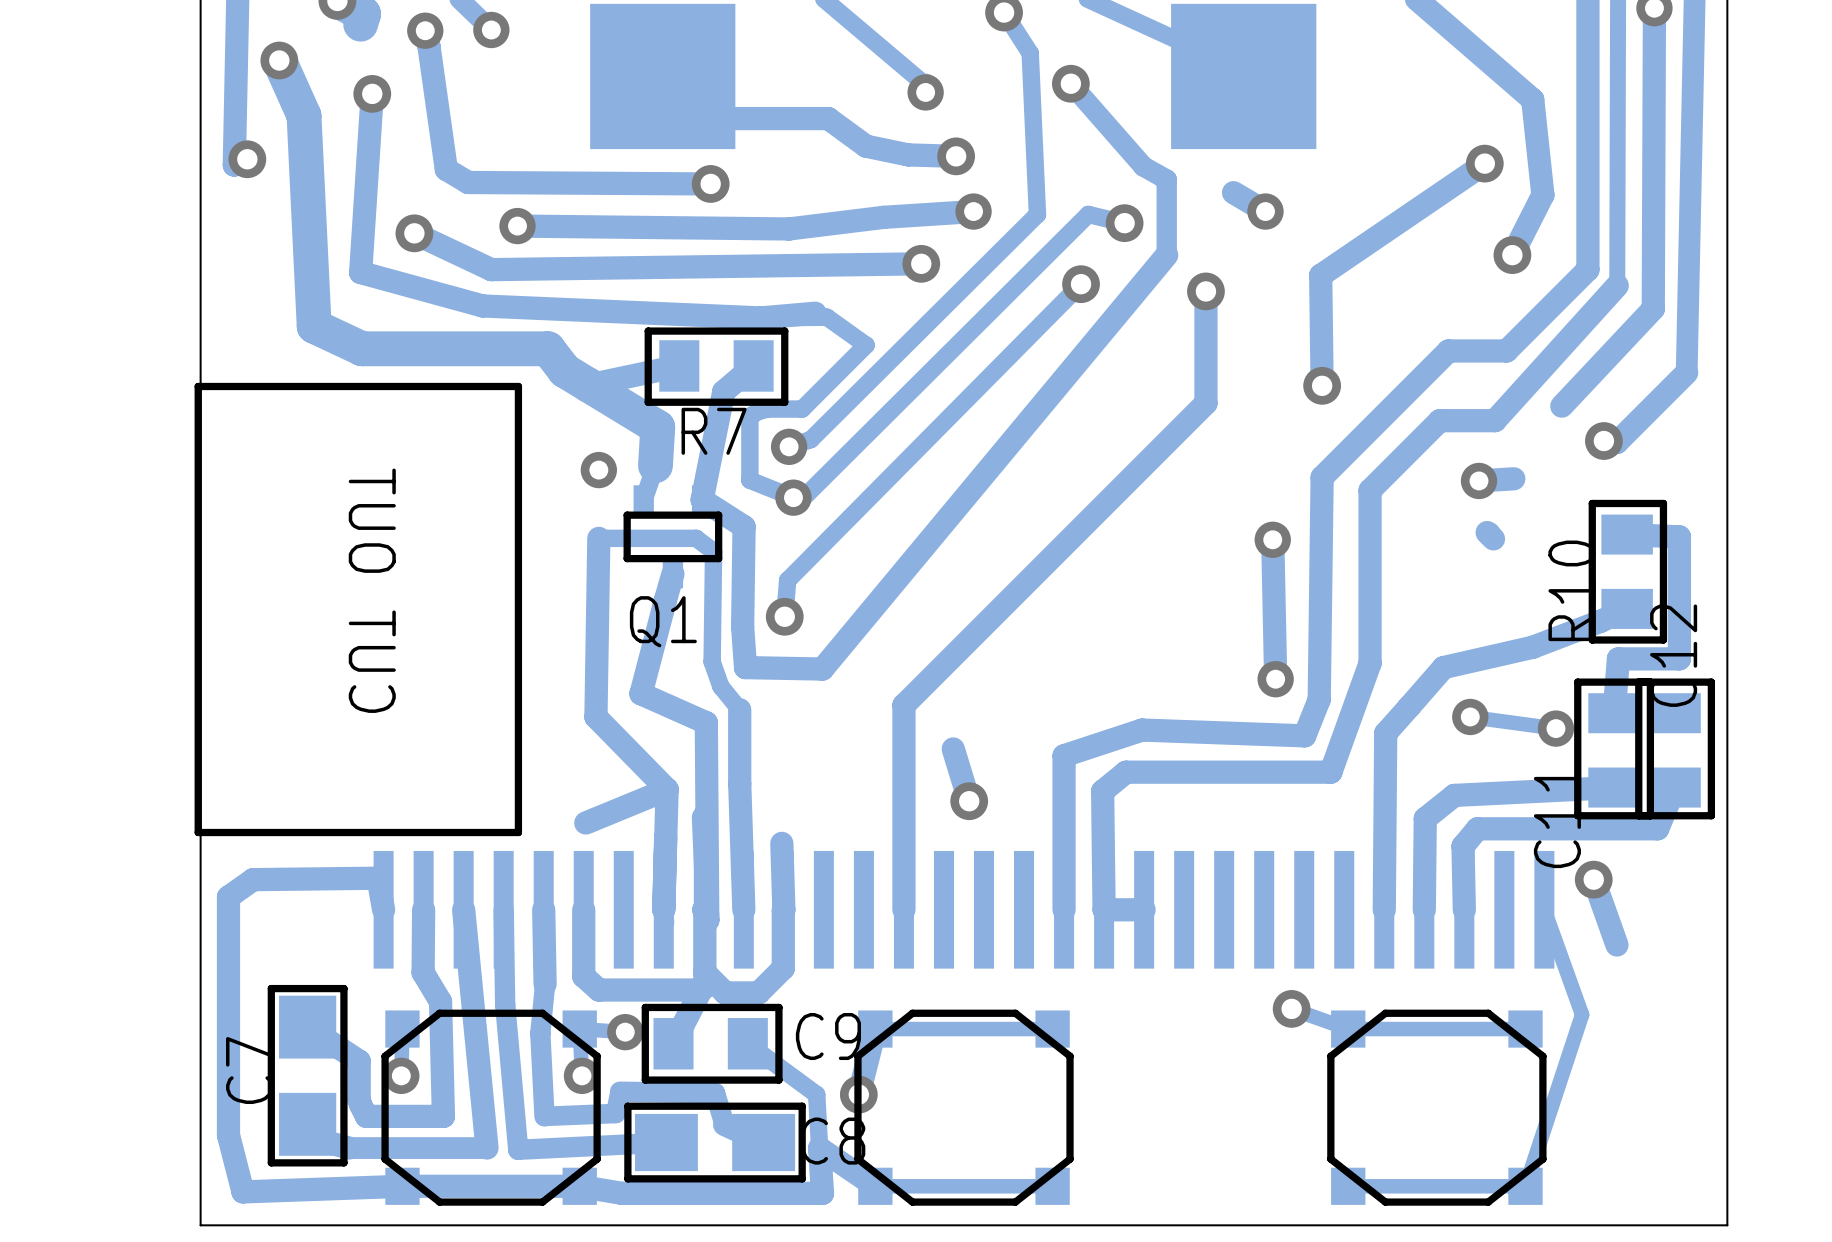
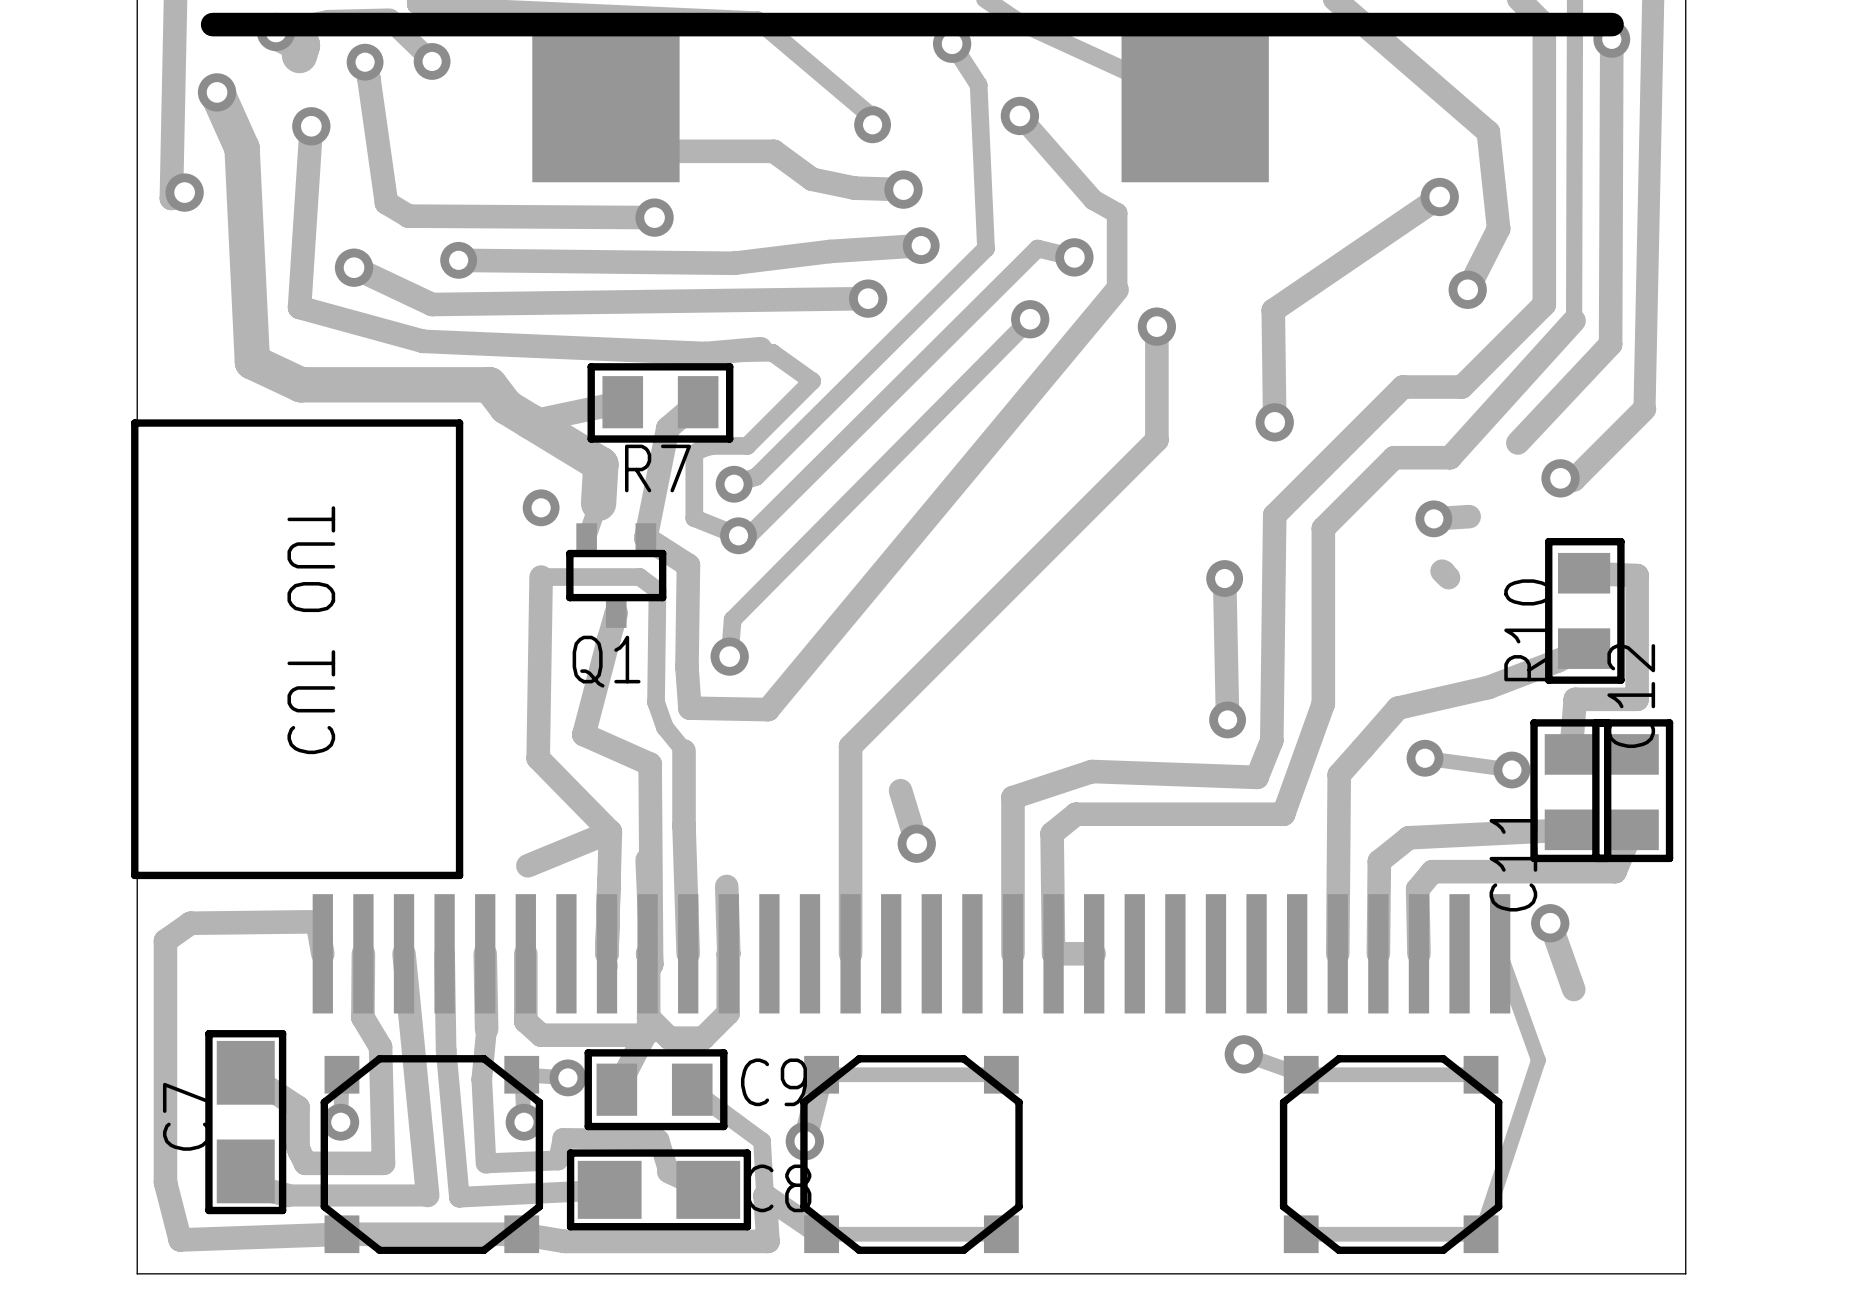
track: (1233, 192) (1265, 211) -> none
via: (1265, 211) -> none

